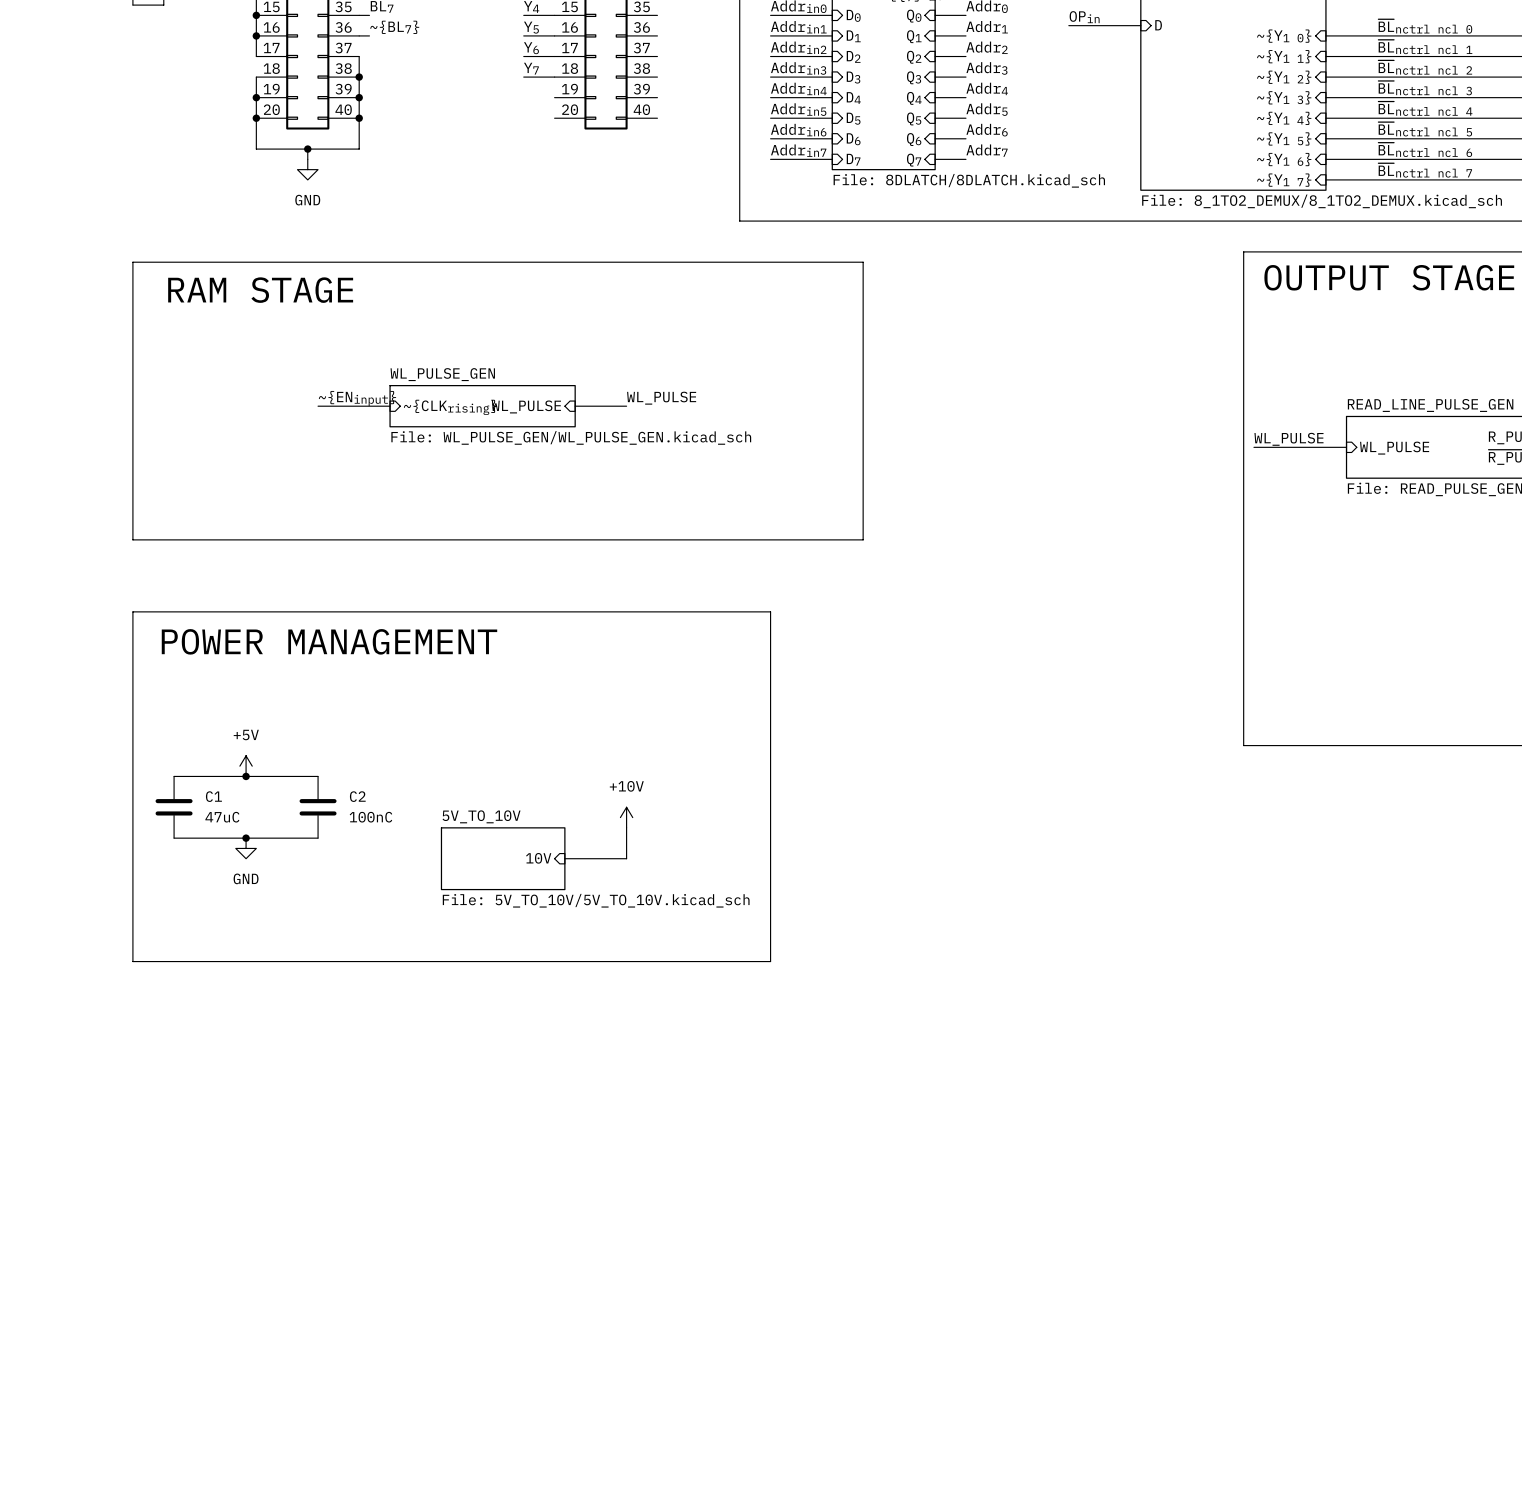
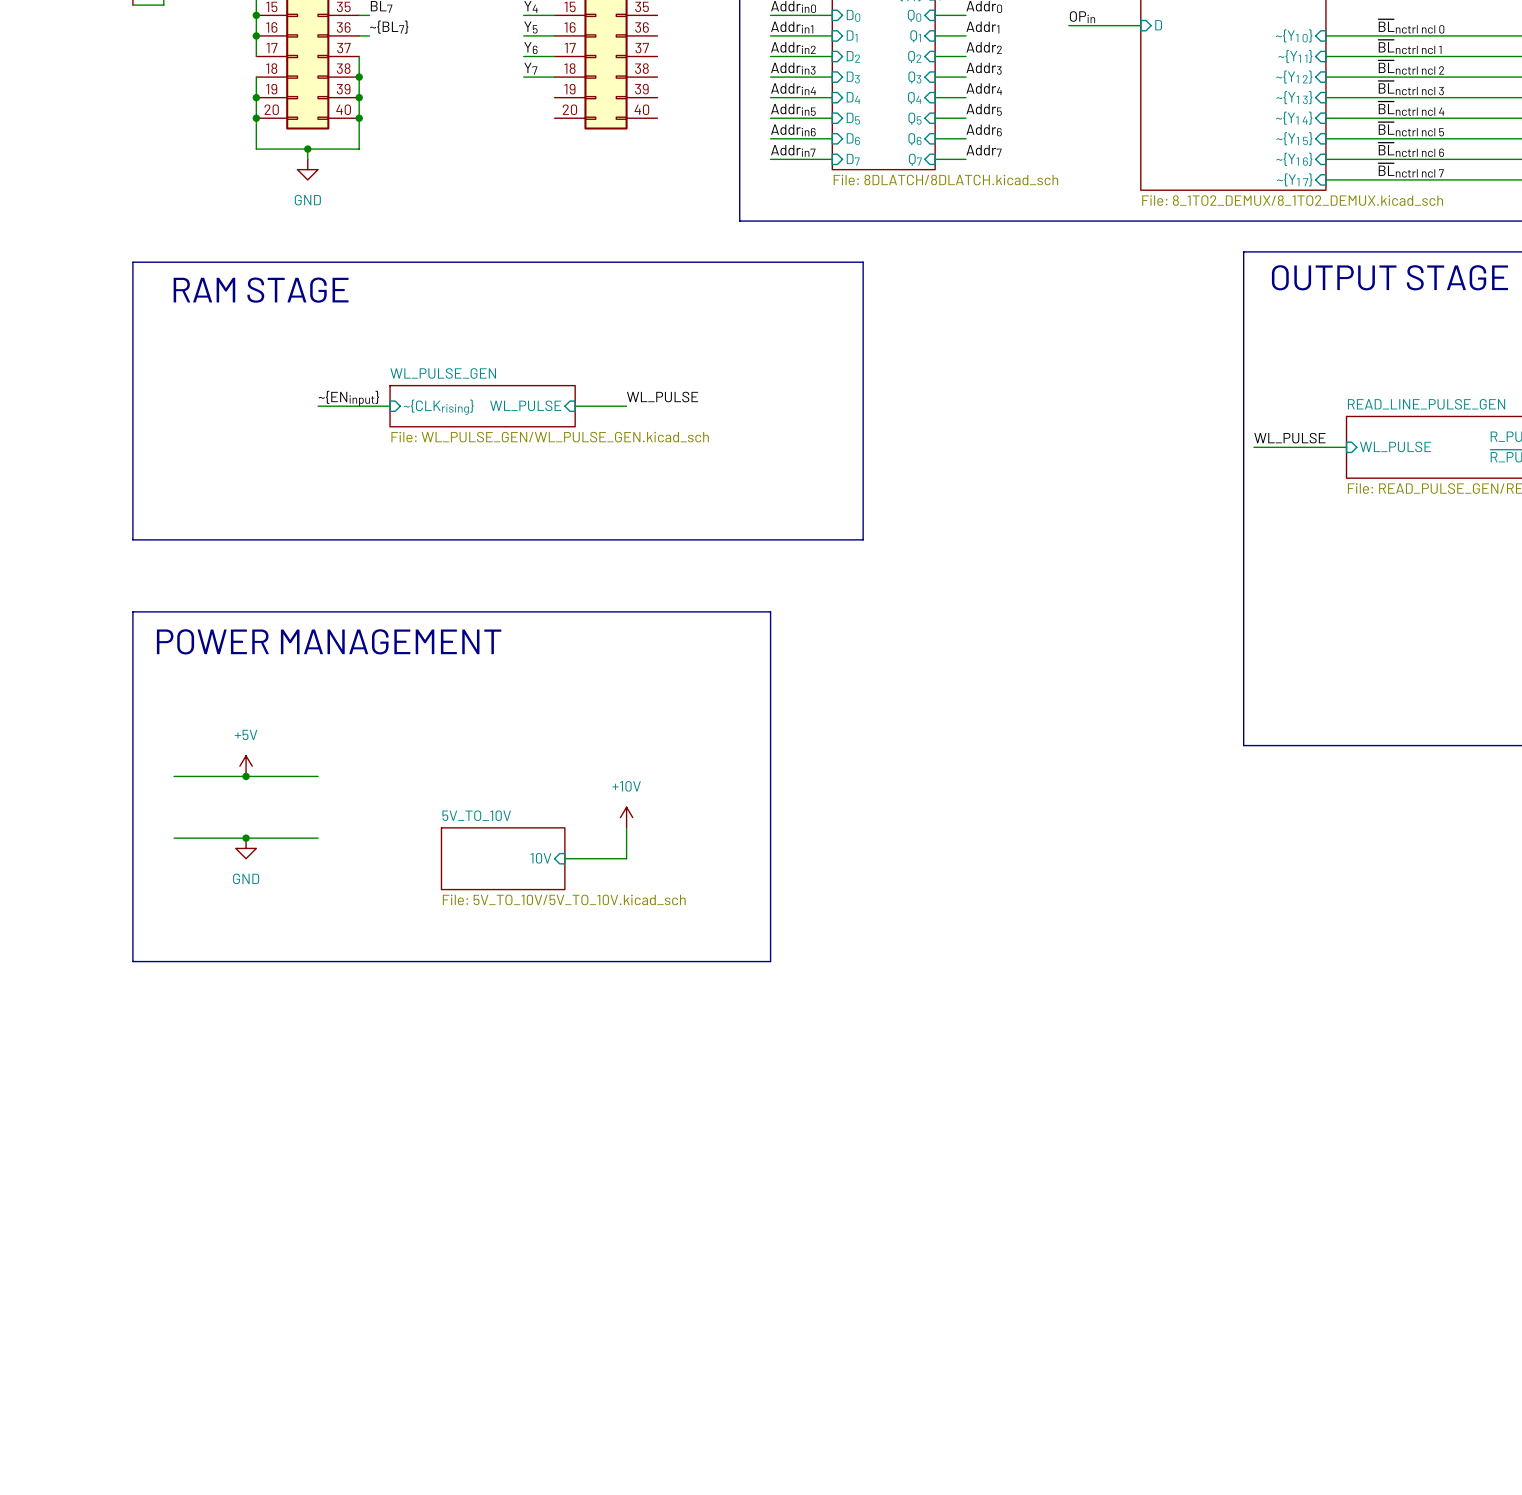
C1: 47uC (174, 807) -> none
C2: 100nC (318, 807) -> none

